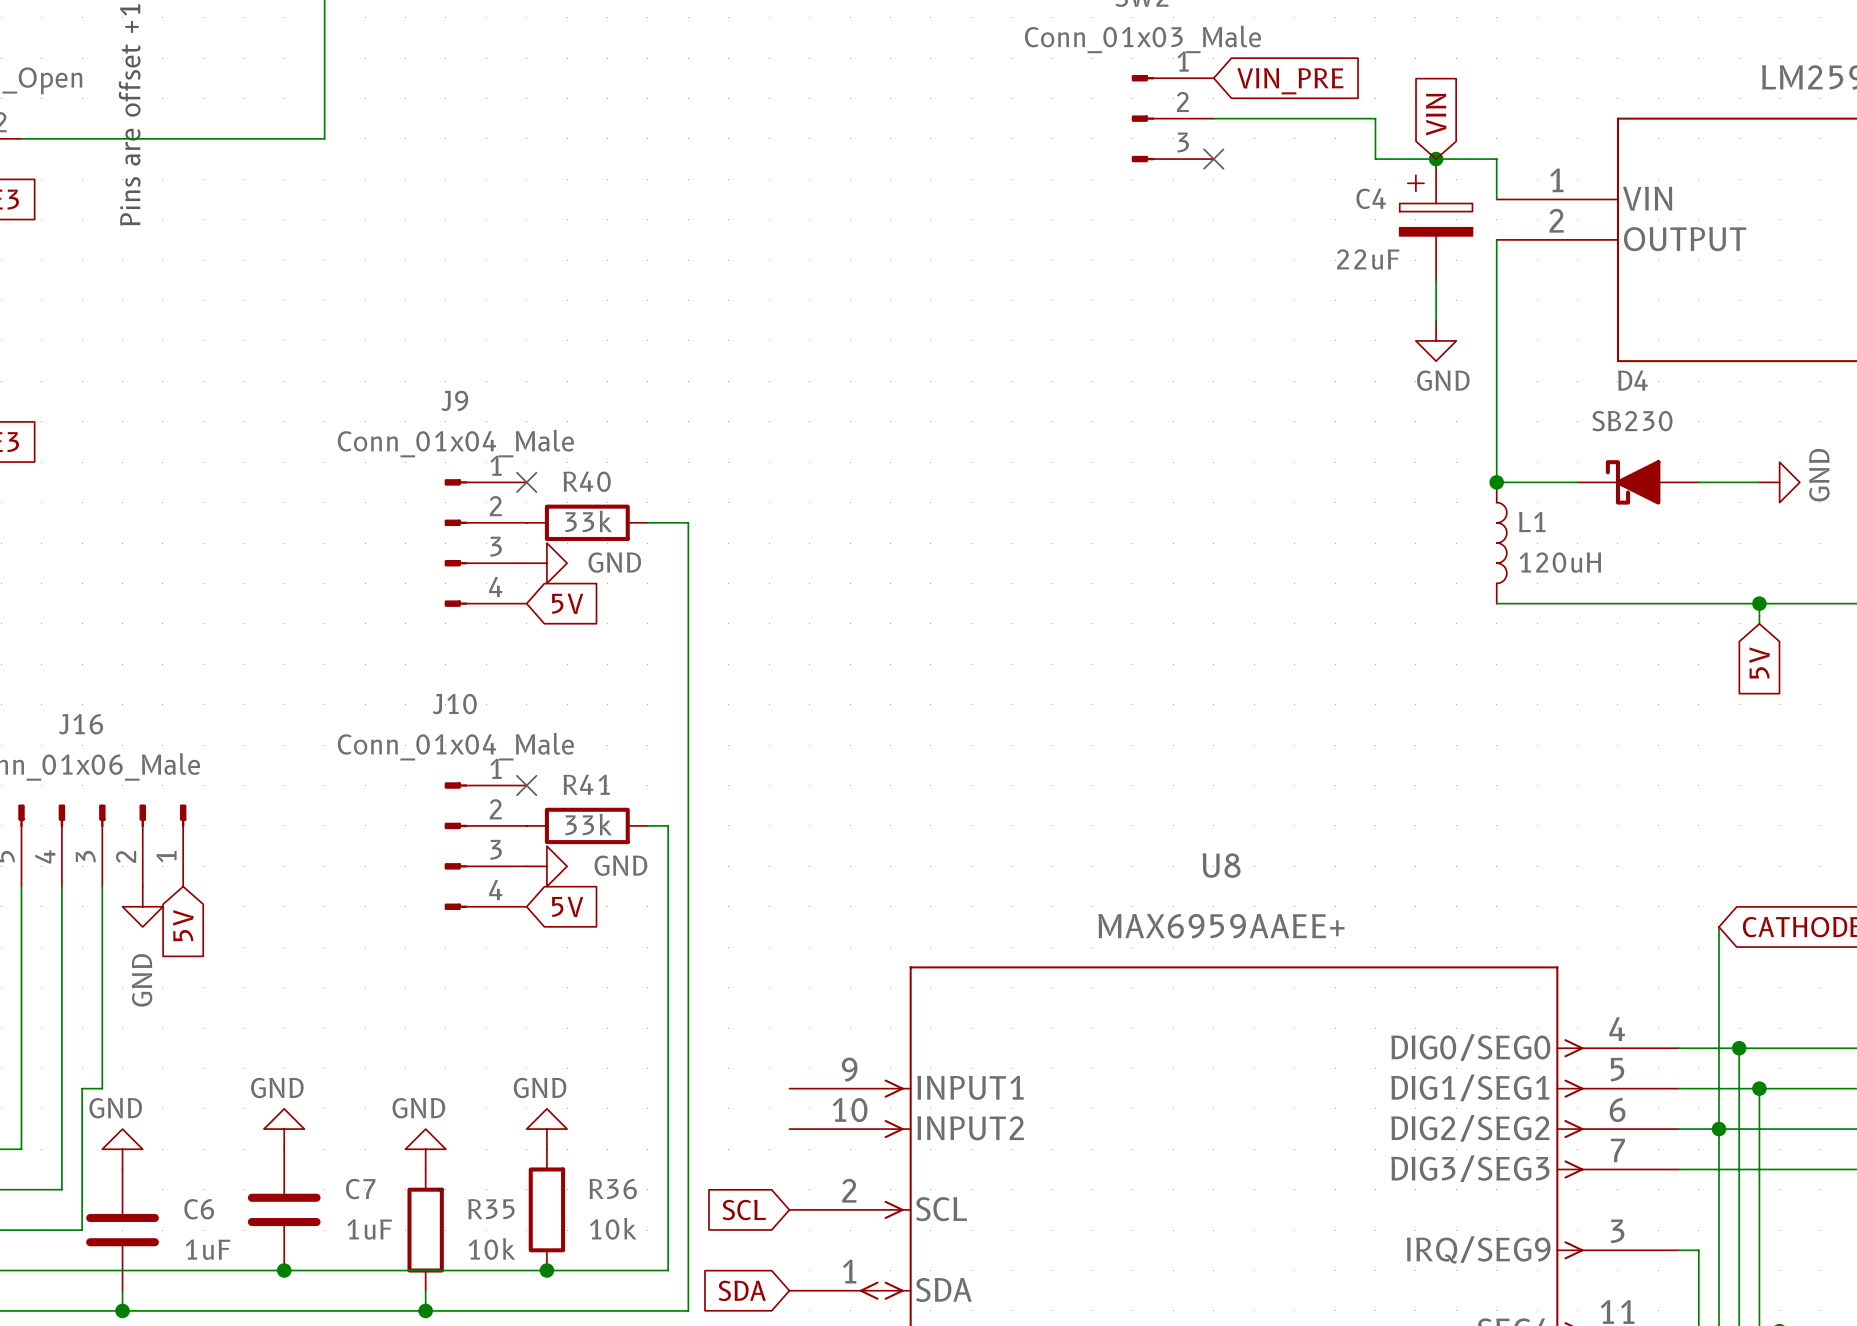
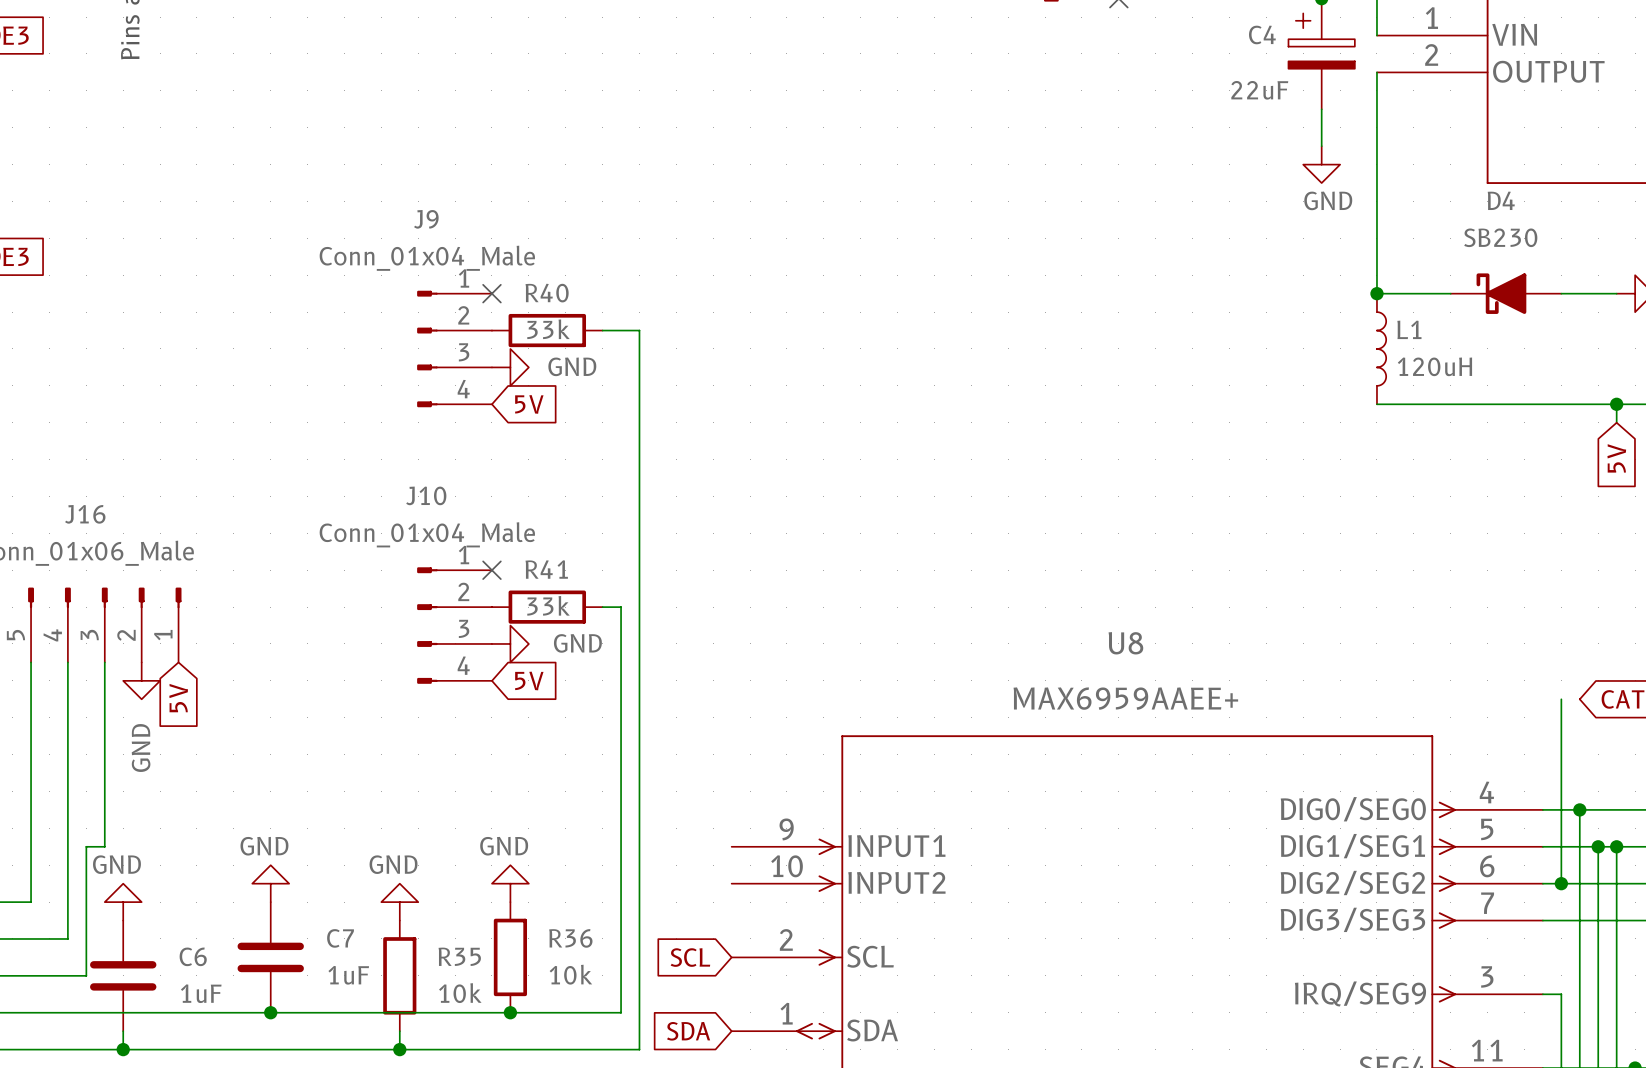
wire: none -> (1561, 699) (1561, 883)
wire: (1719, 926) (1719, 1048) -> none
junction: none -> (1579, 809)
wire: (1739, 1048) (1739, 1088) -> none
junction: (1739, 1048) -> none
junction: none -> (1598, 846)
junction position: (1719, 1129) -> (1561, 883)

